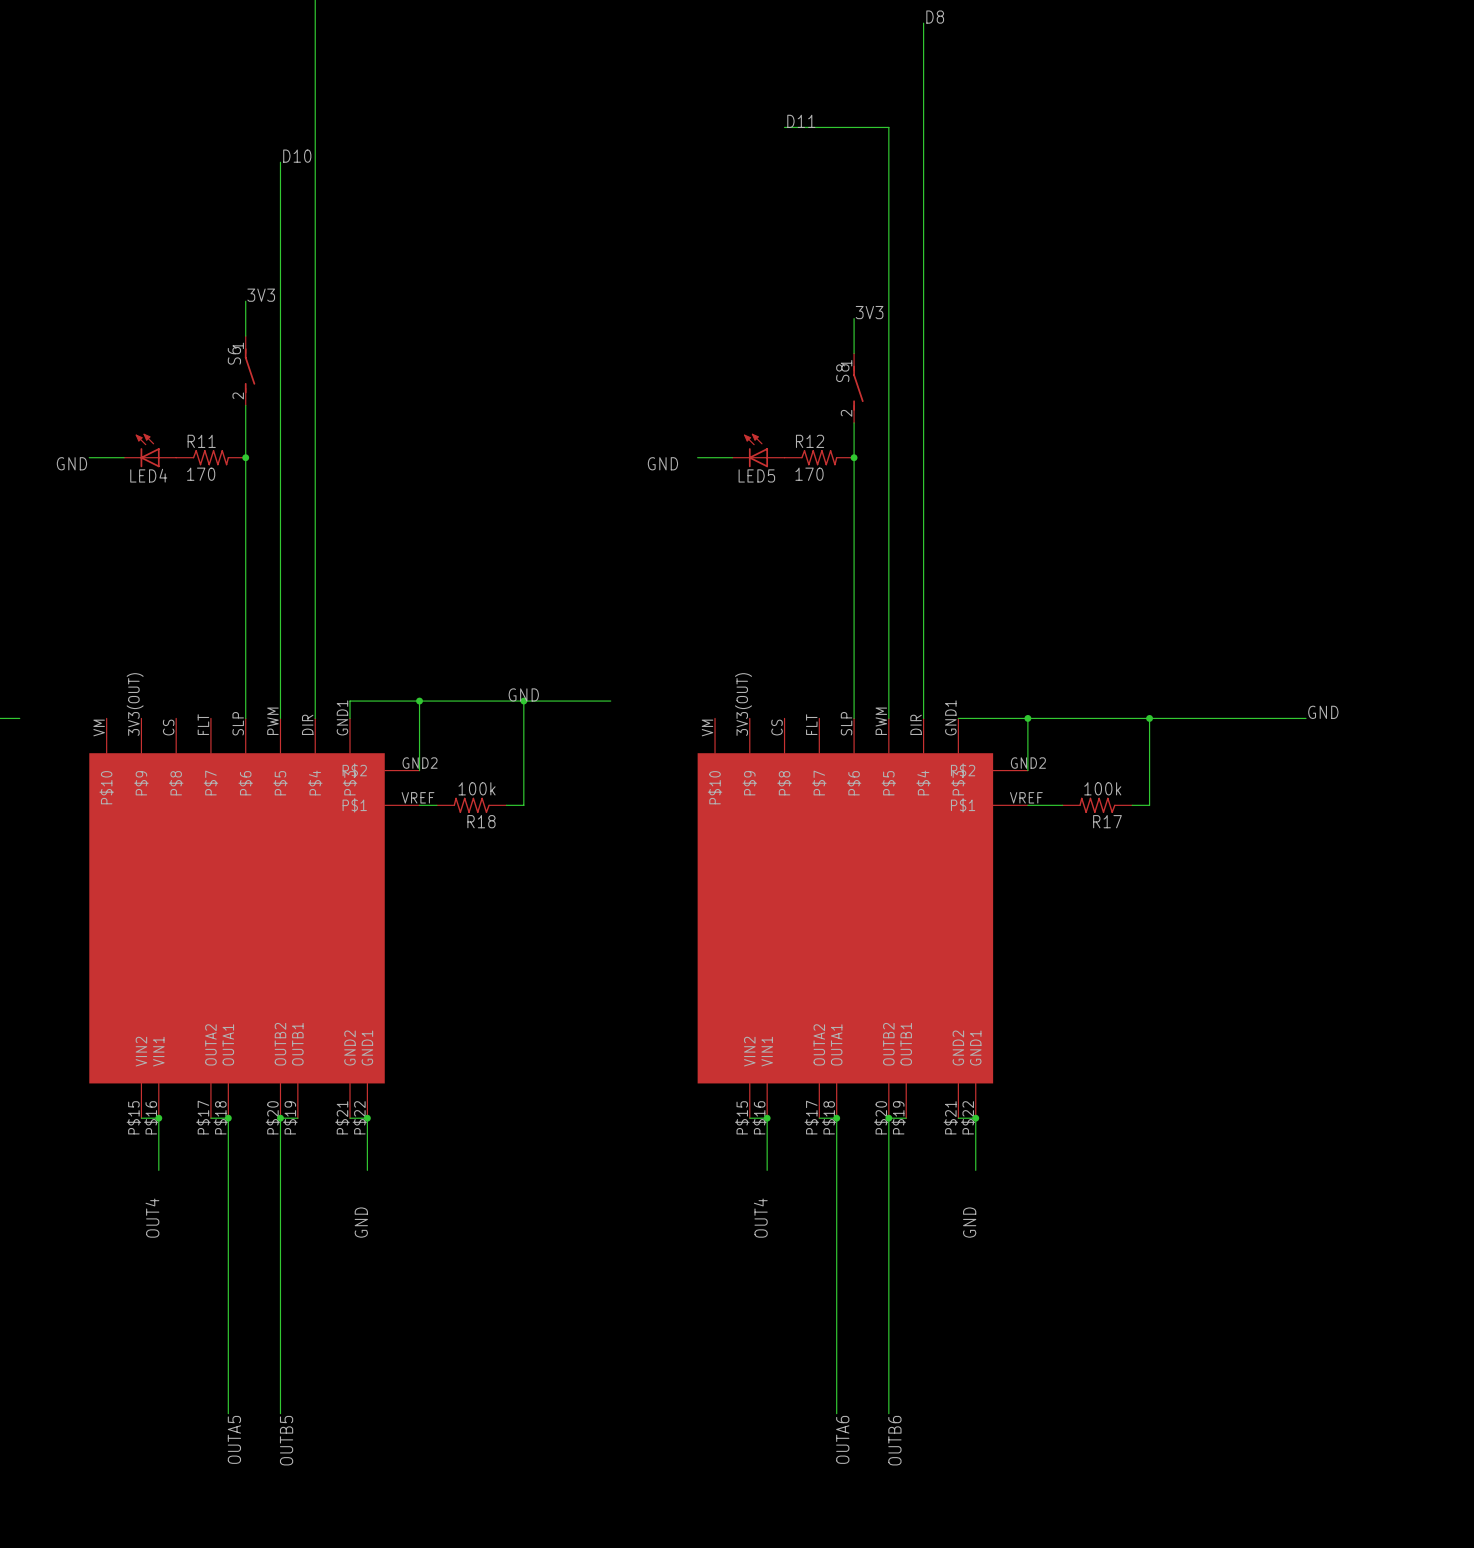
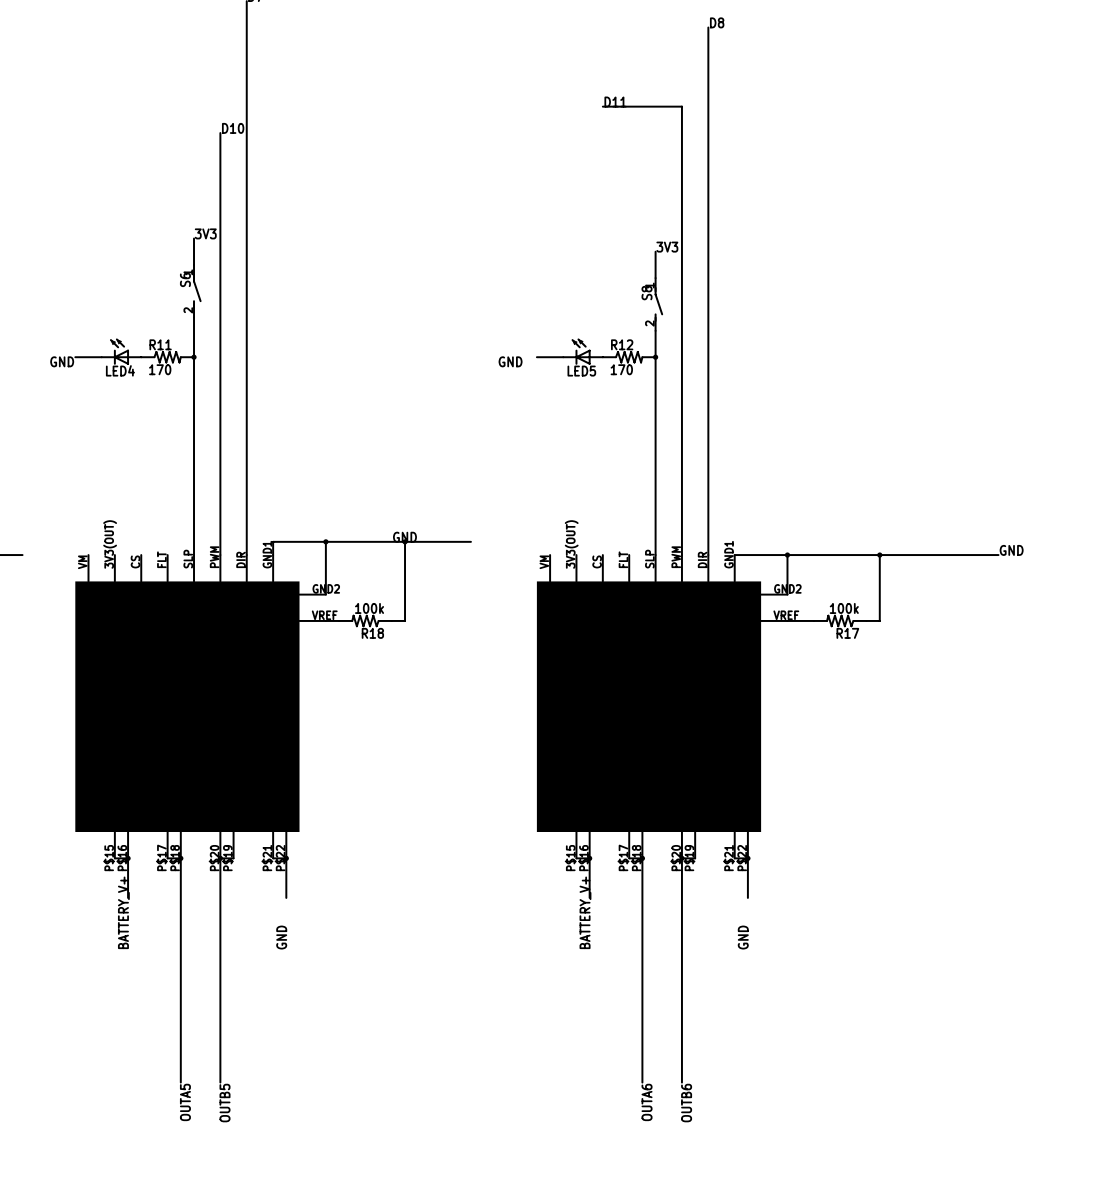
label: OUT4 (152, 1218) -> BATTERY_V+ (123, 912)
label: OUT4 (760, 1218) -> BATTERY_V+ (585, 912)

